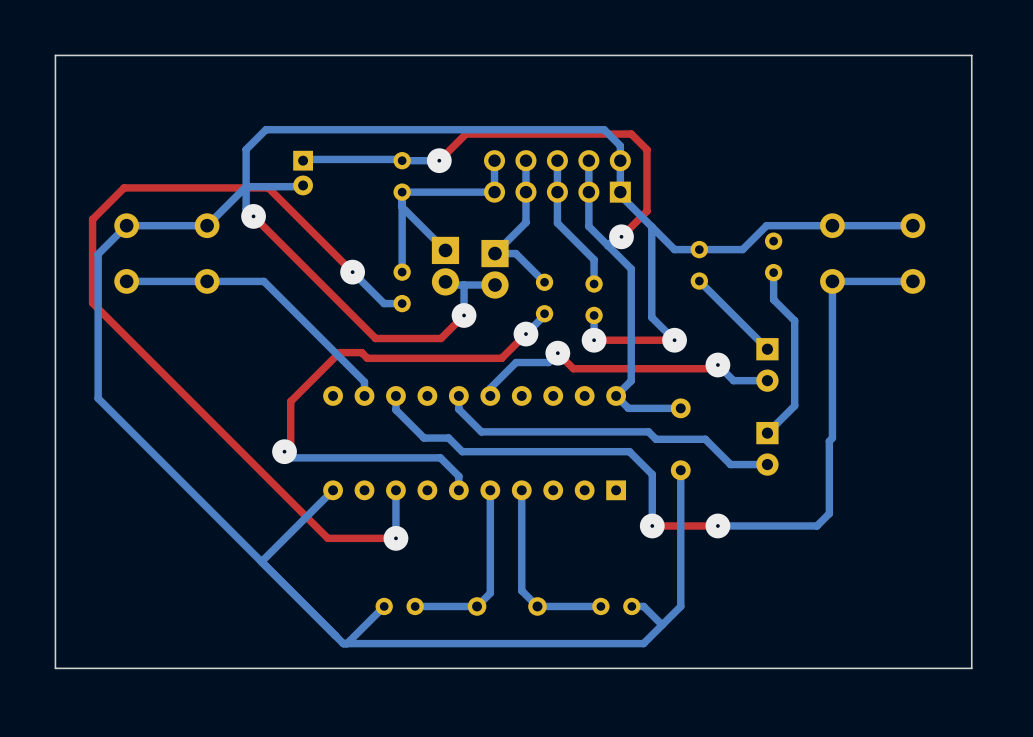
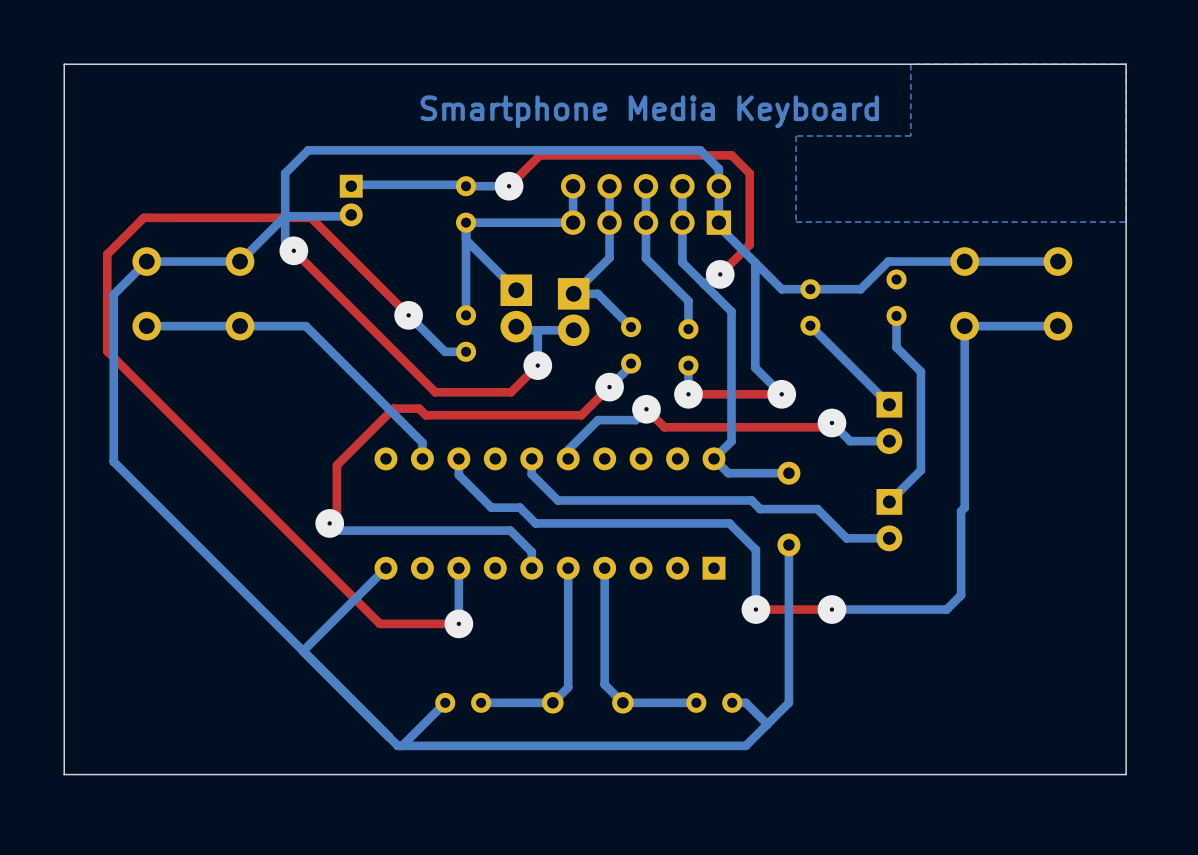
bottom zone outline: none -> (1126, 64) (910, 64) (910, 135) (796, 135) (796, 222) (1126, 222) (1126, 64)
text: none -> Smartphone Media Keyboard (649, 111)

